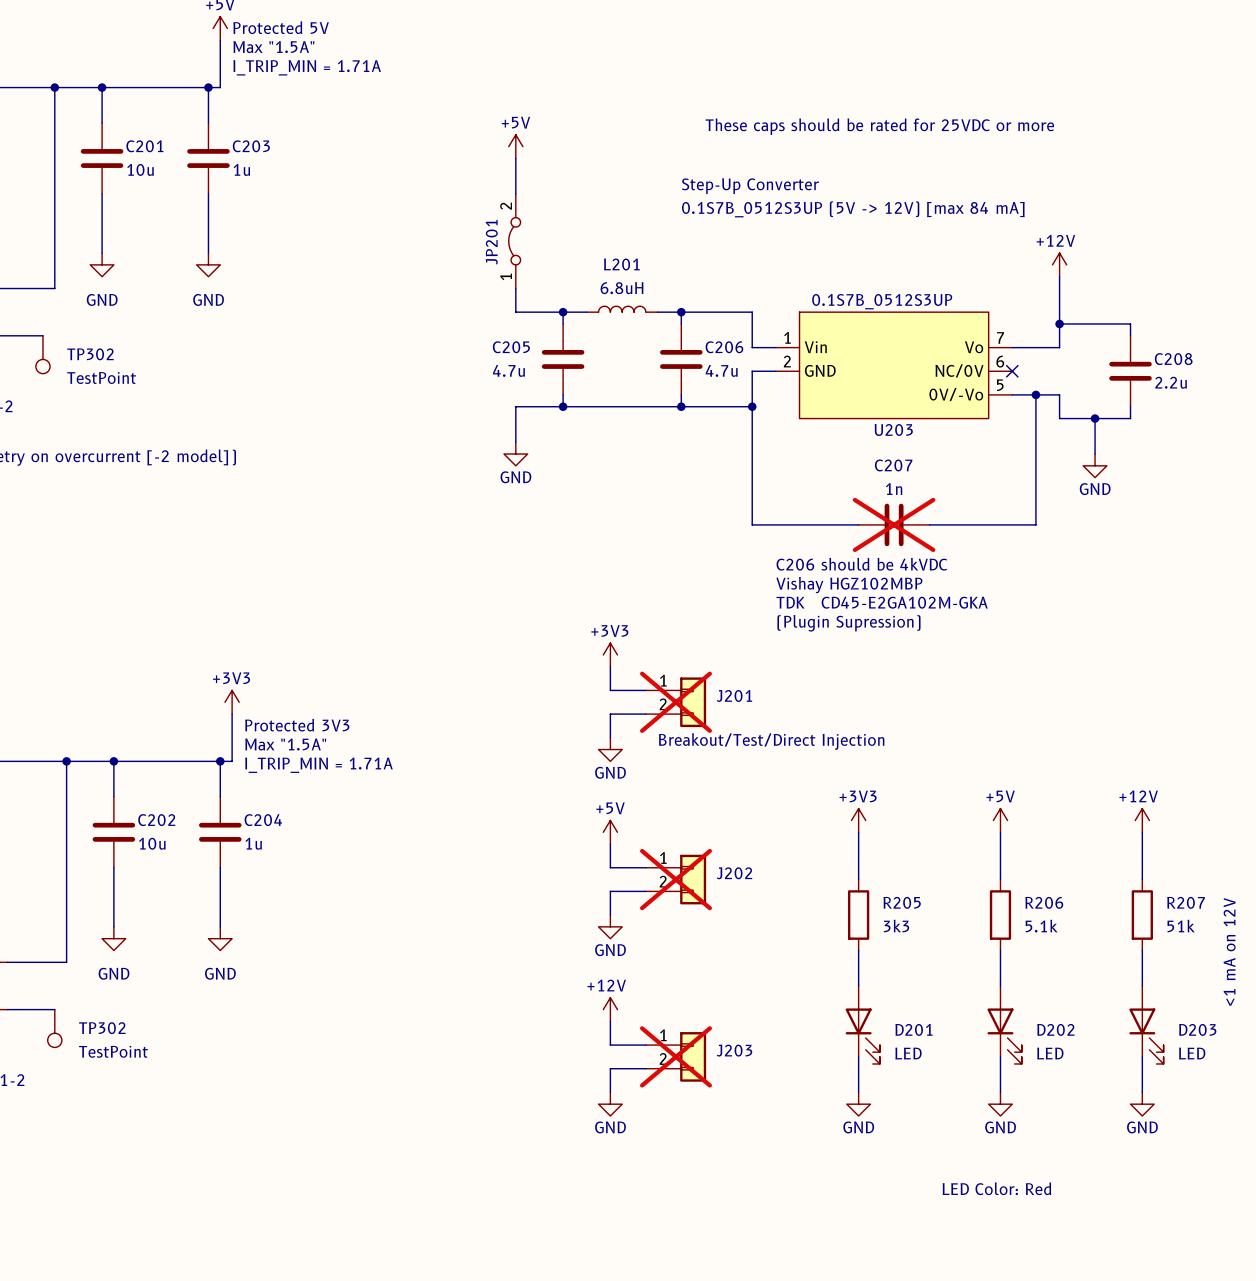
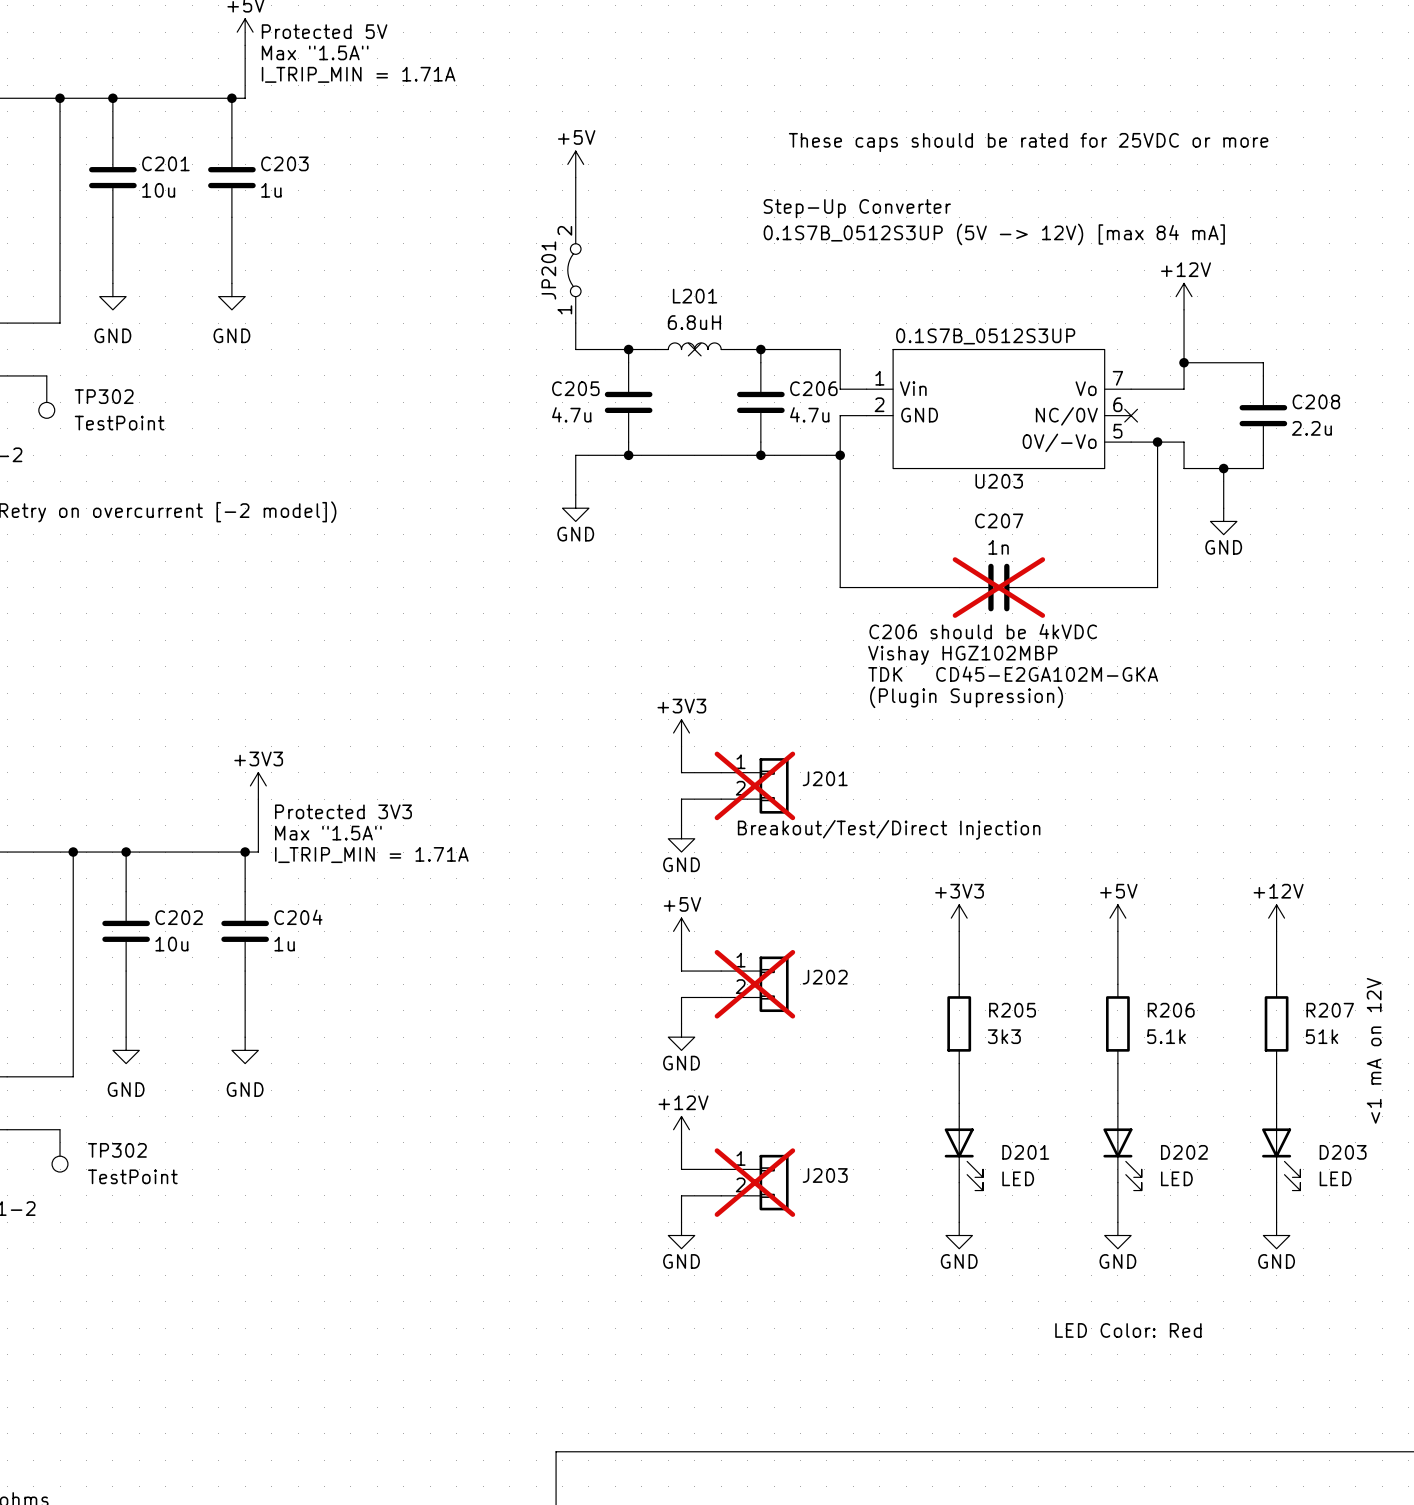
no-connect mark: none -> (694, 349)

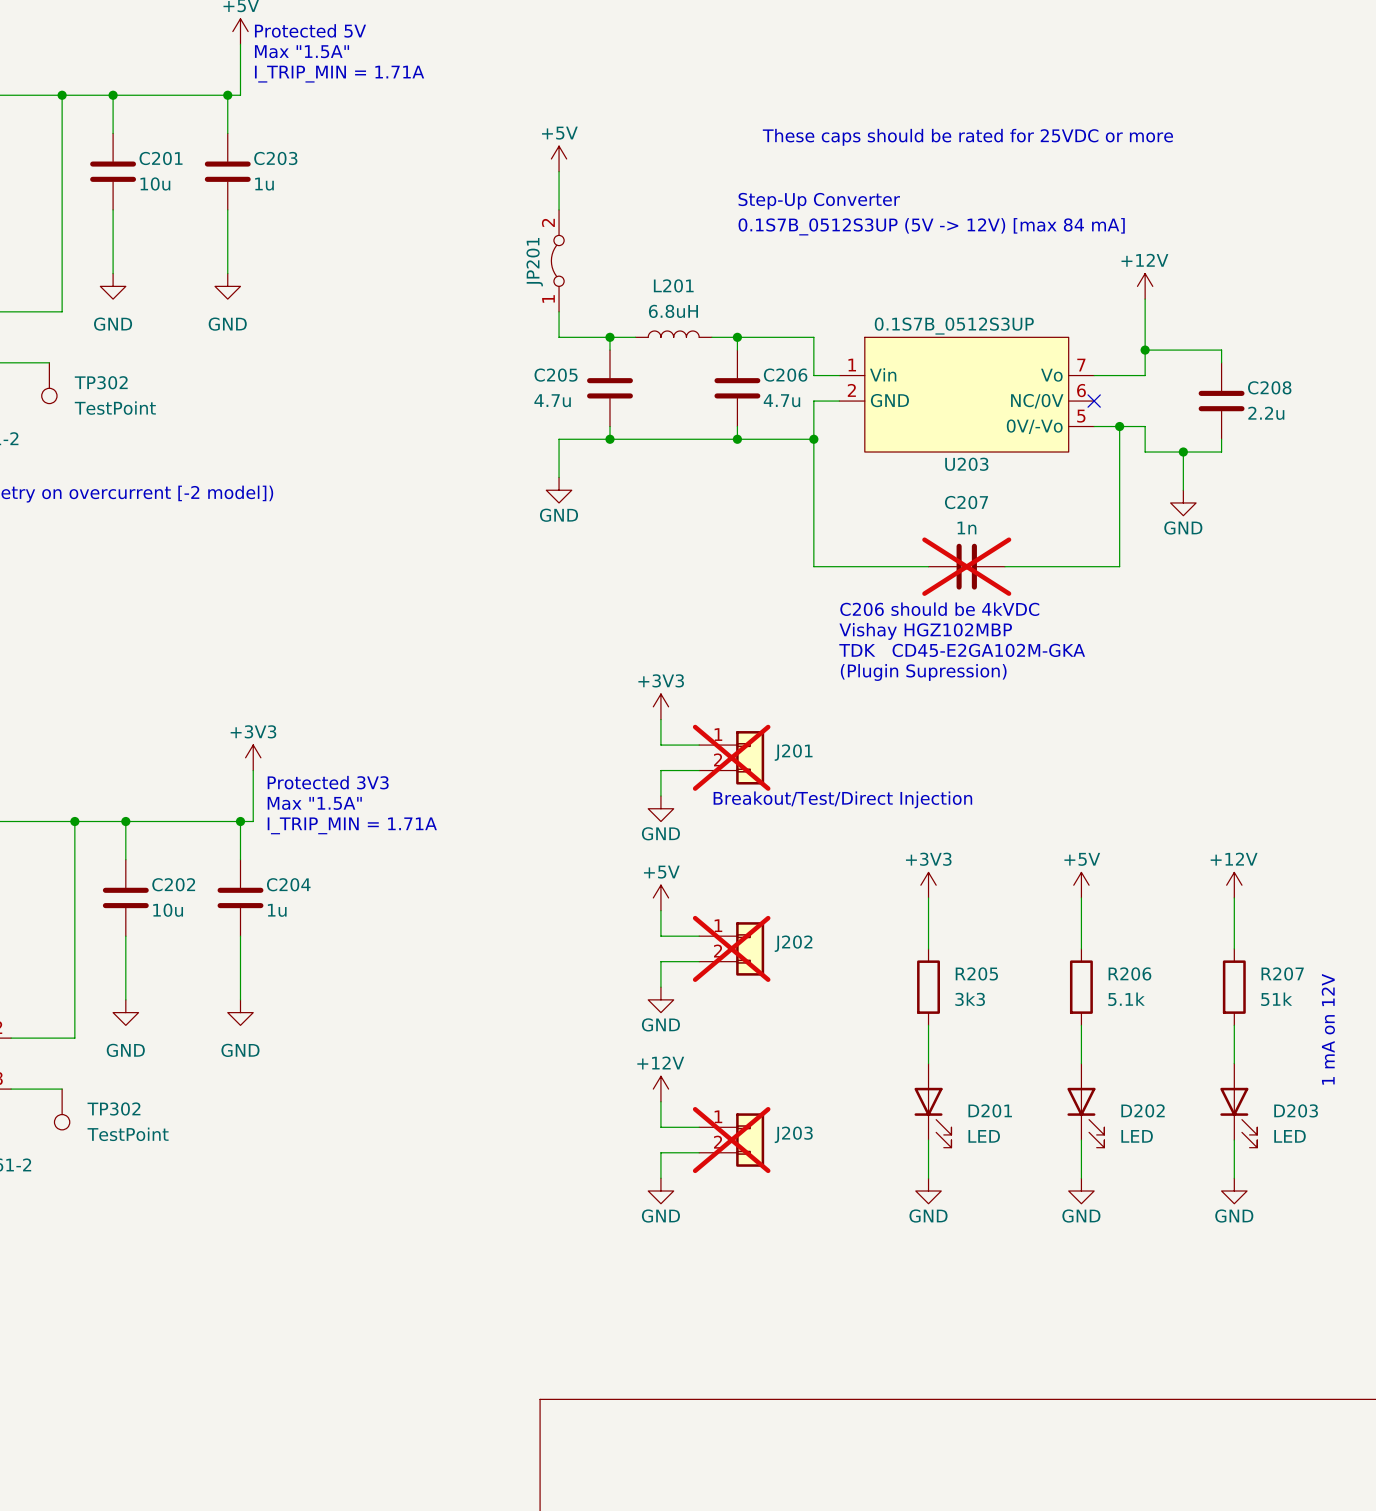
no-connect mark: (694, 349) -> none
text: <1 mA on 12V (1374, 1050) -> 1 mA on 12V (1328, 1029)
text: LED Color: Red (1128, 1330) -> none

